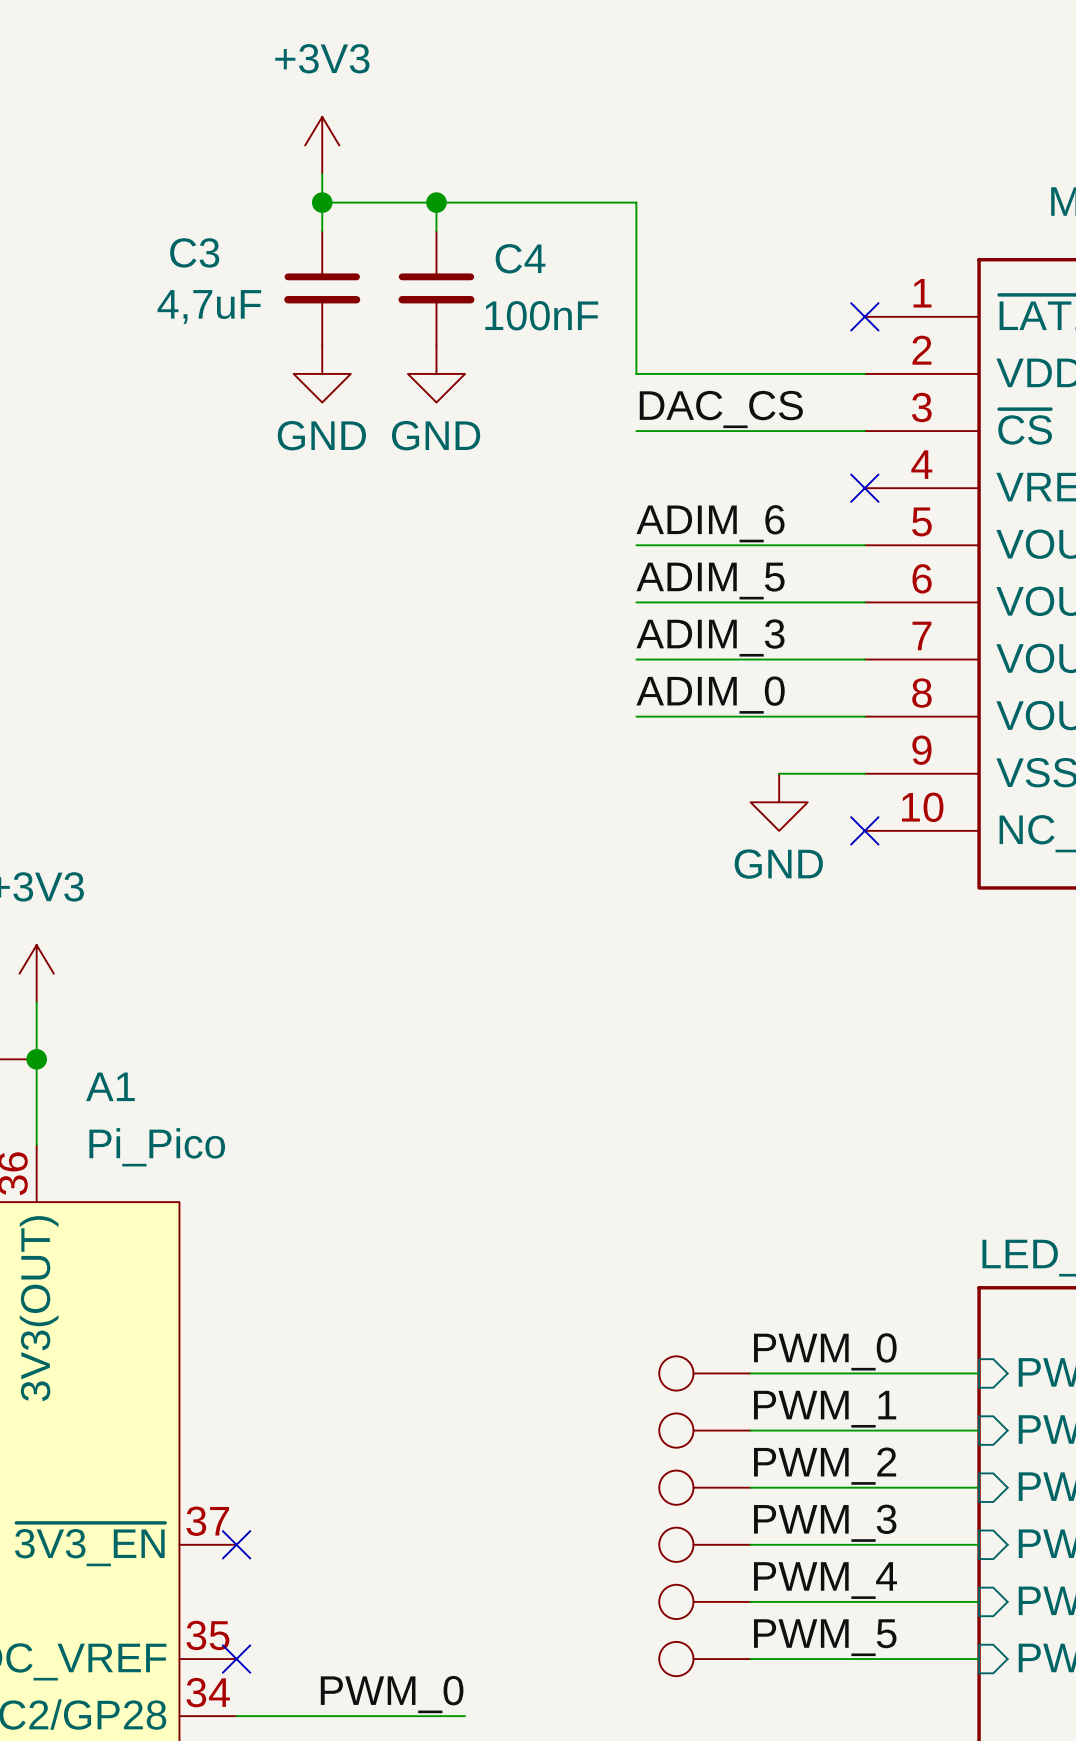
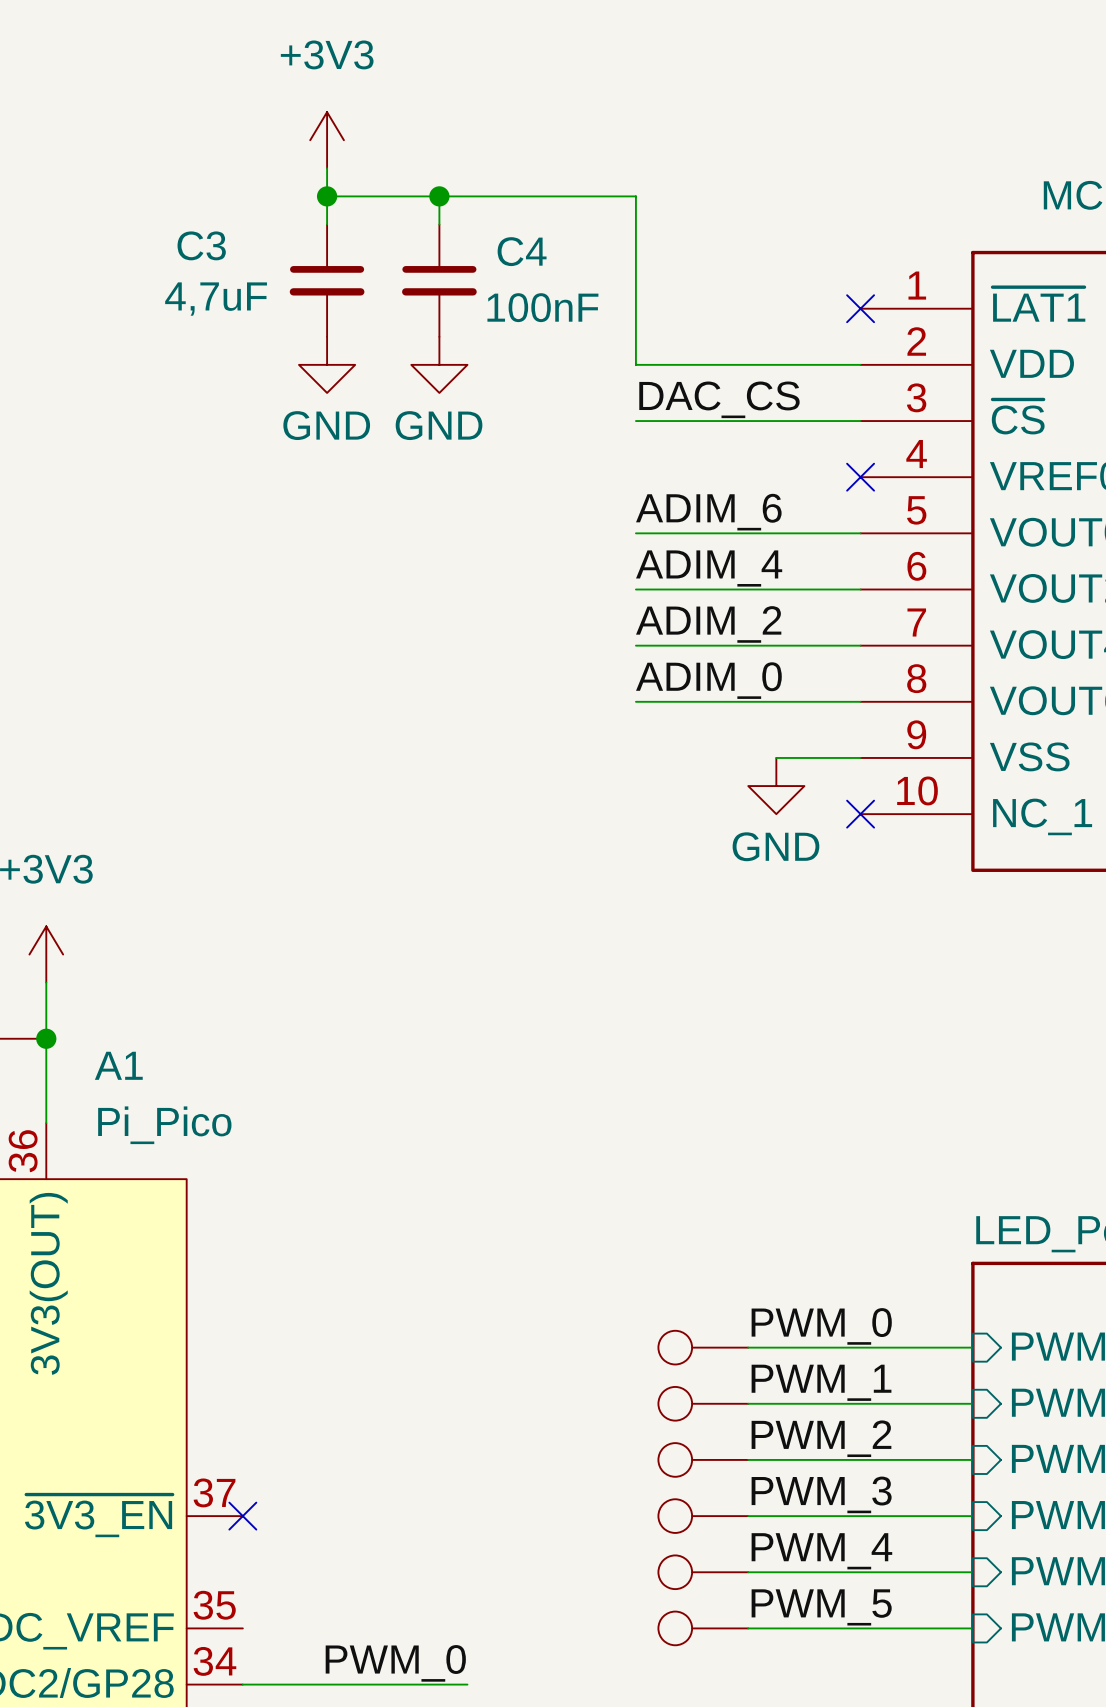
label: ADIM_5 (710, 581) -> ADIM_4 (709, 568)
label: ADIM_3 (710, 637) -> ADIM_2 (708, 624)
no-connect mark: (236, 1659) -> none

